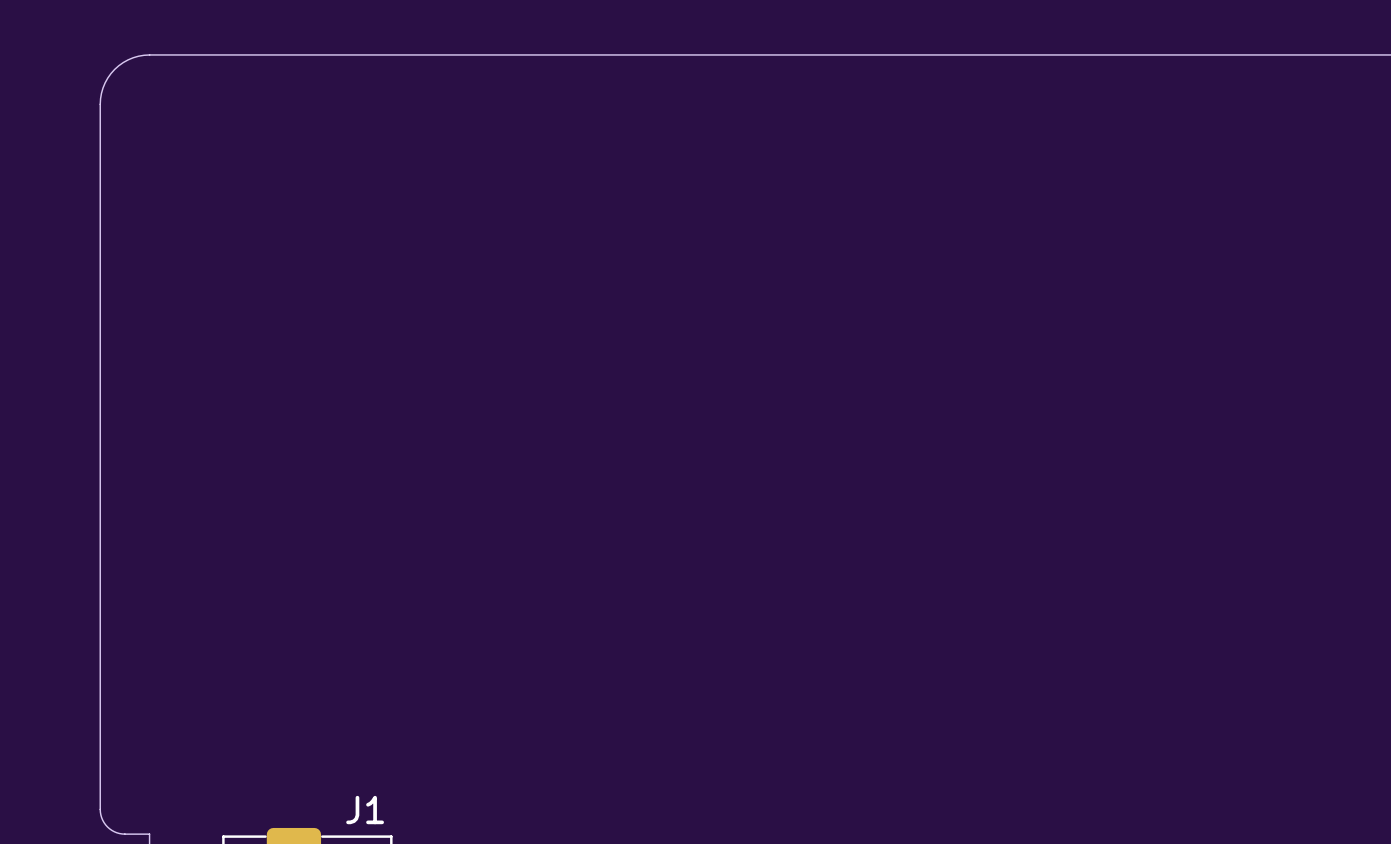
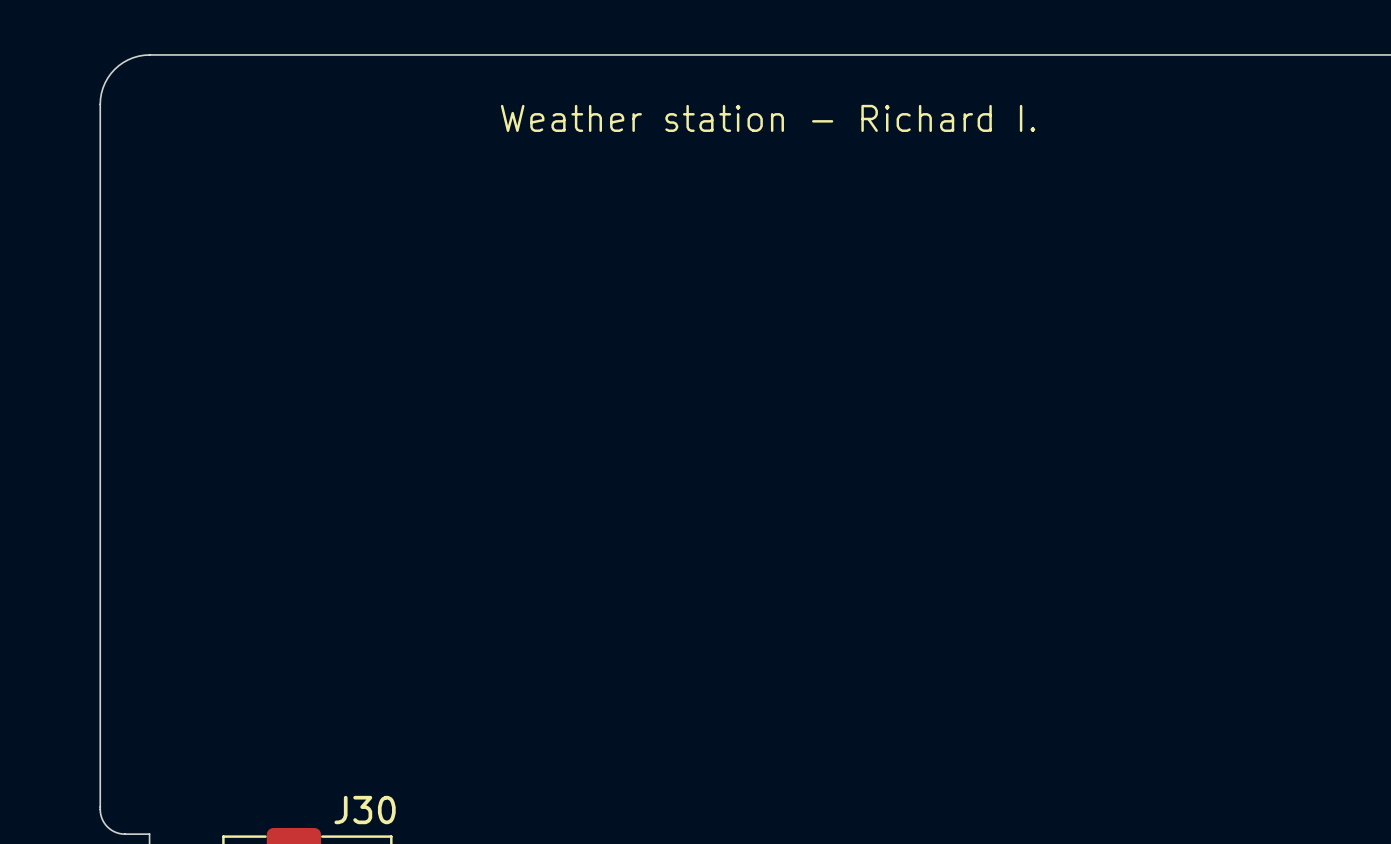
text: none -> Weather station - Richard I. (768, 118)
J1 name: J1 (365, 810) -> J30 (365, 810)

